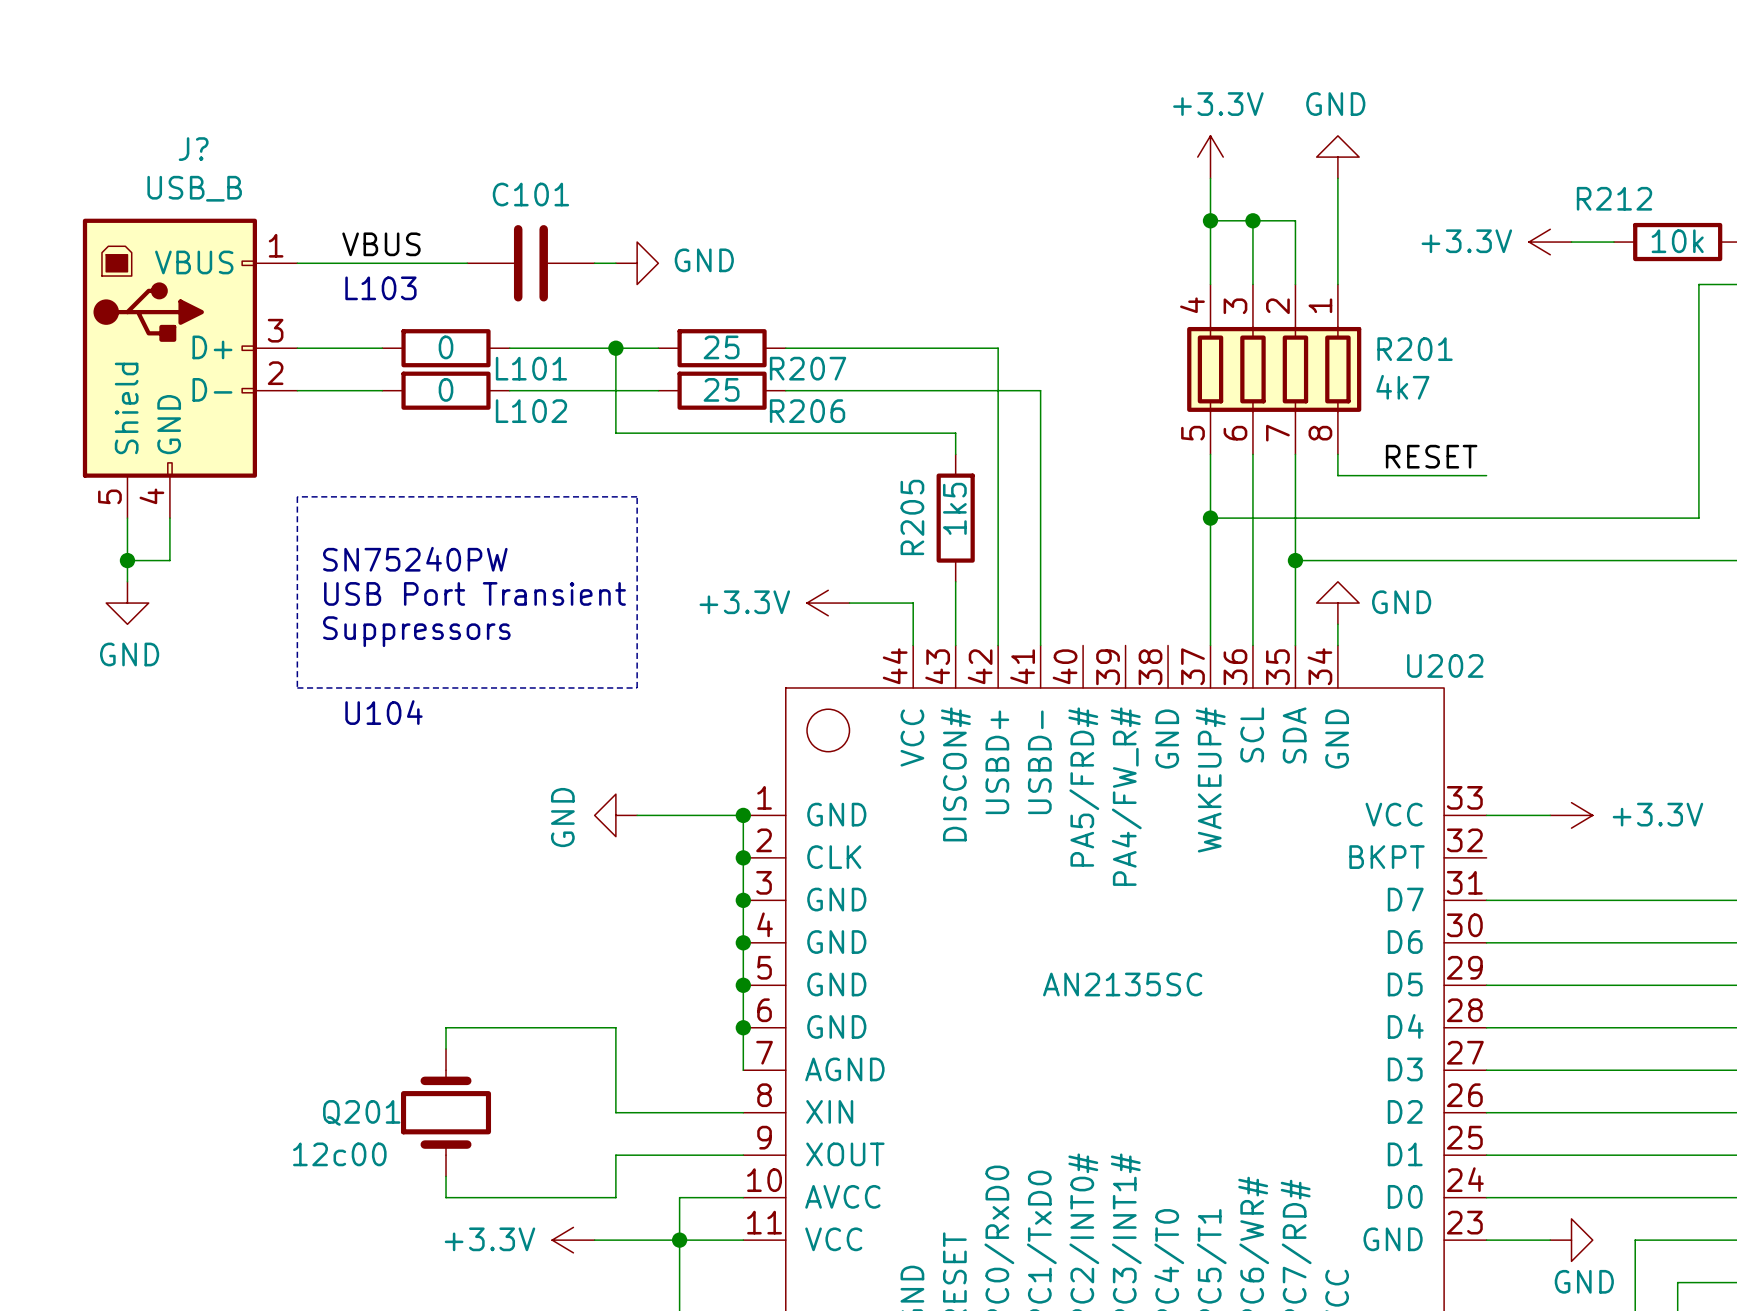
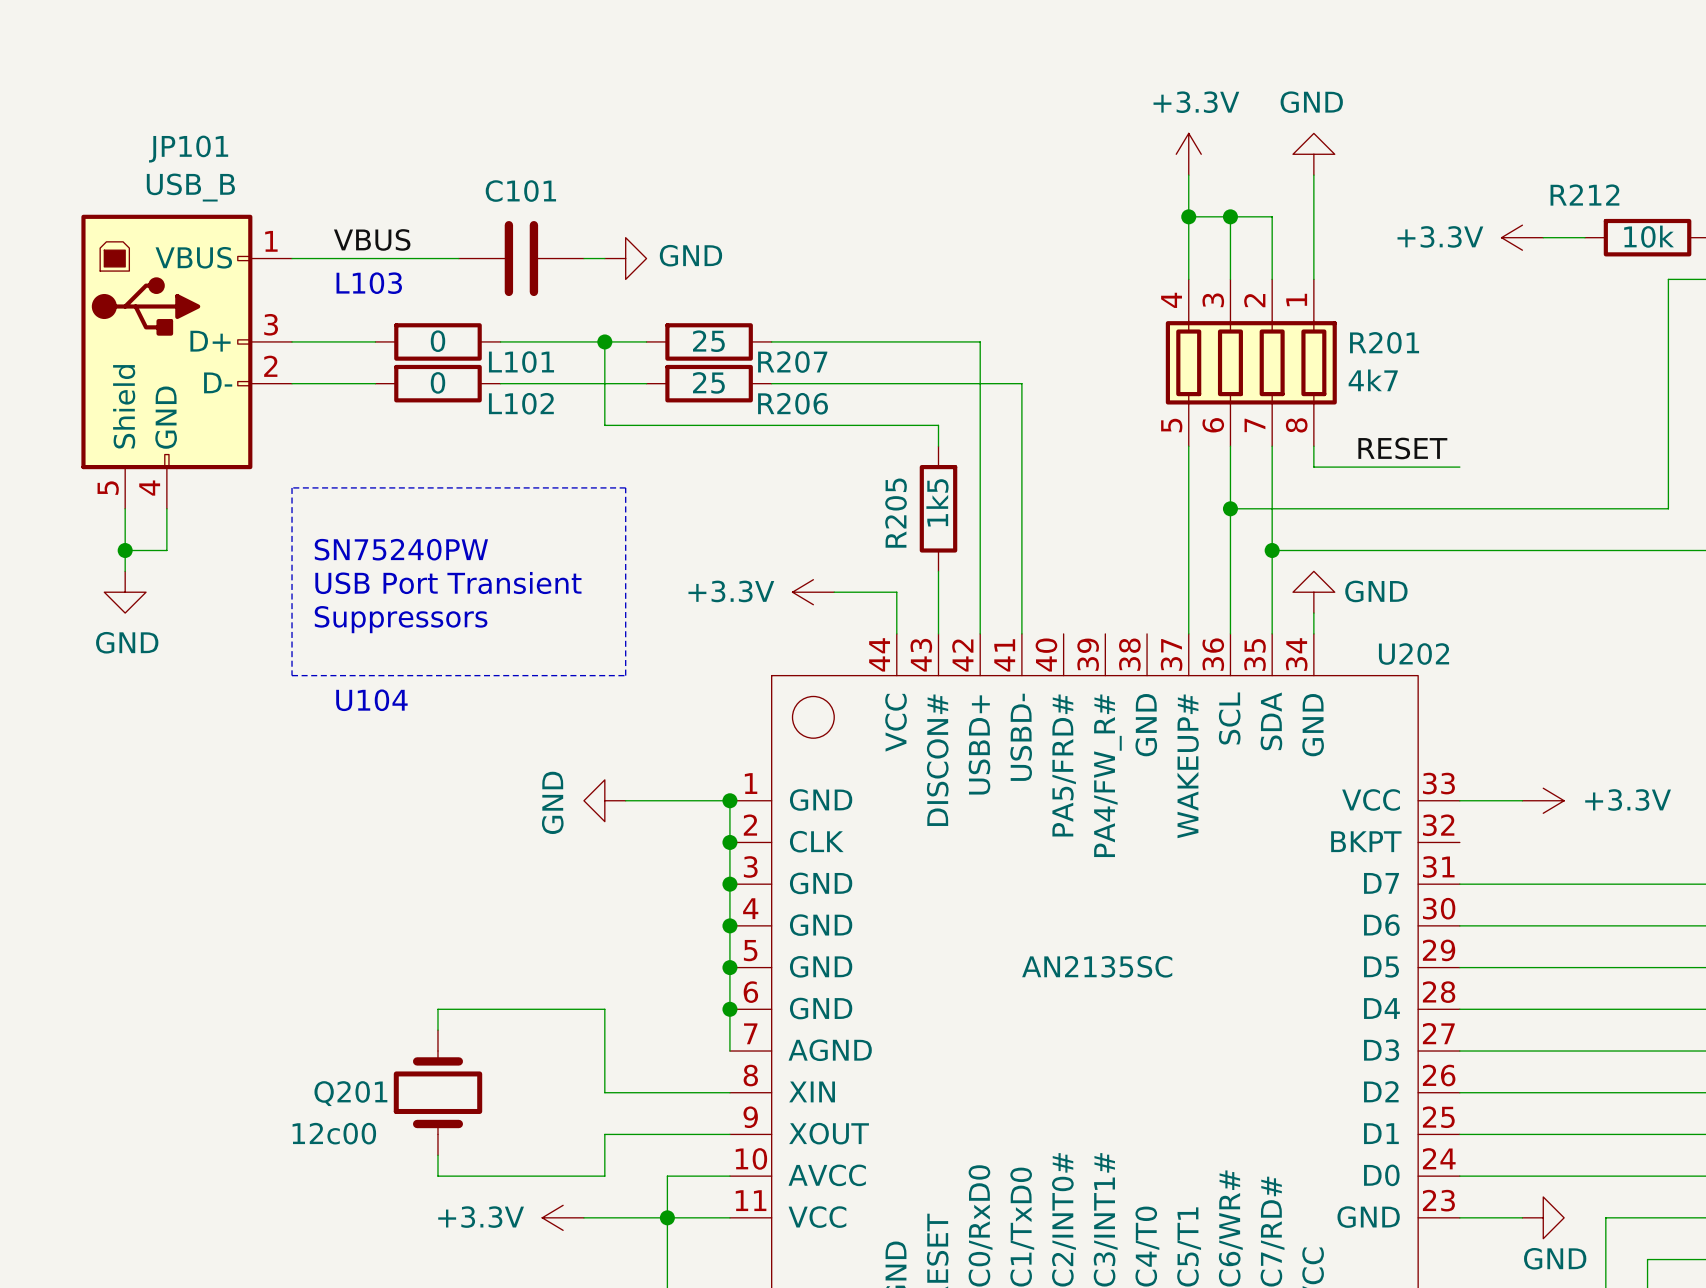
J? name: J? (193, 149) -> JP101 (188, 149)
wire: (1210, 518) (1252, 518) -> none
junction position: (1210, 518) -> (1230, 508)

